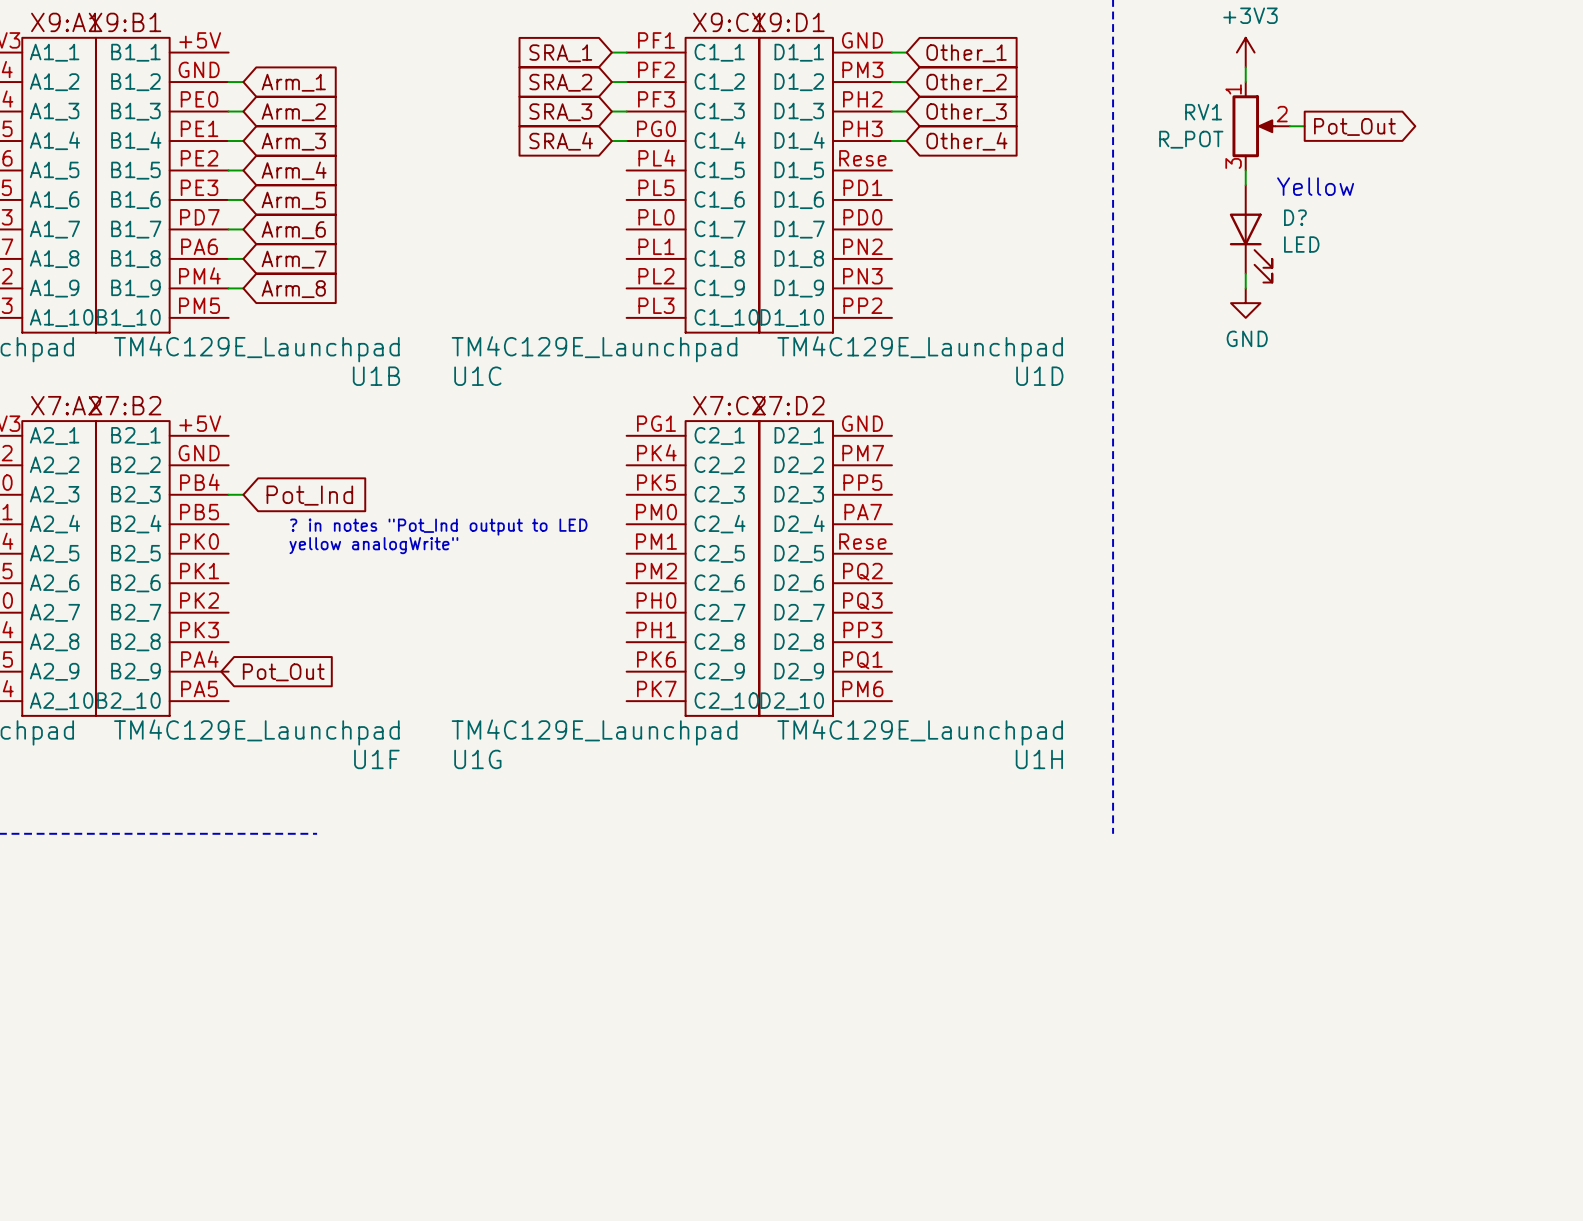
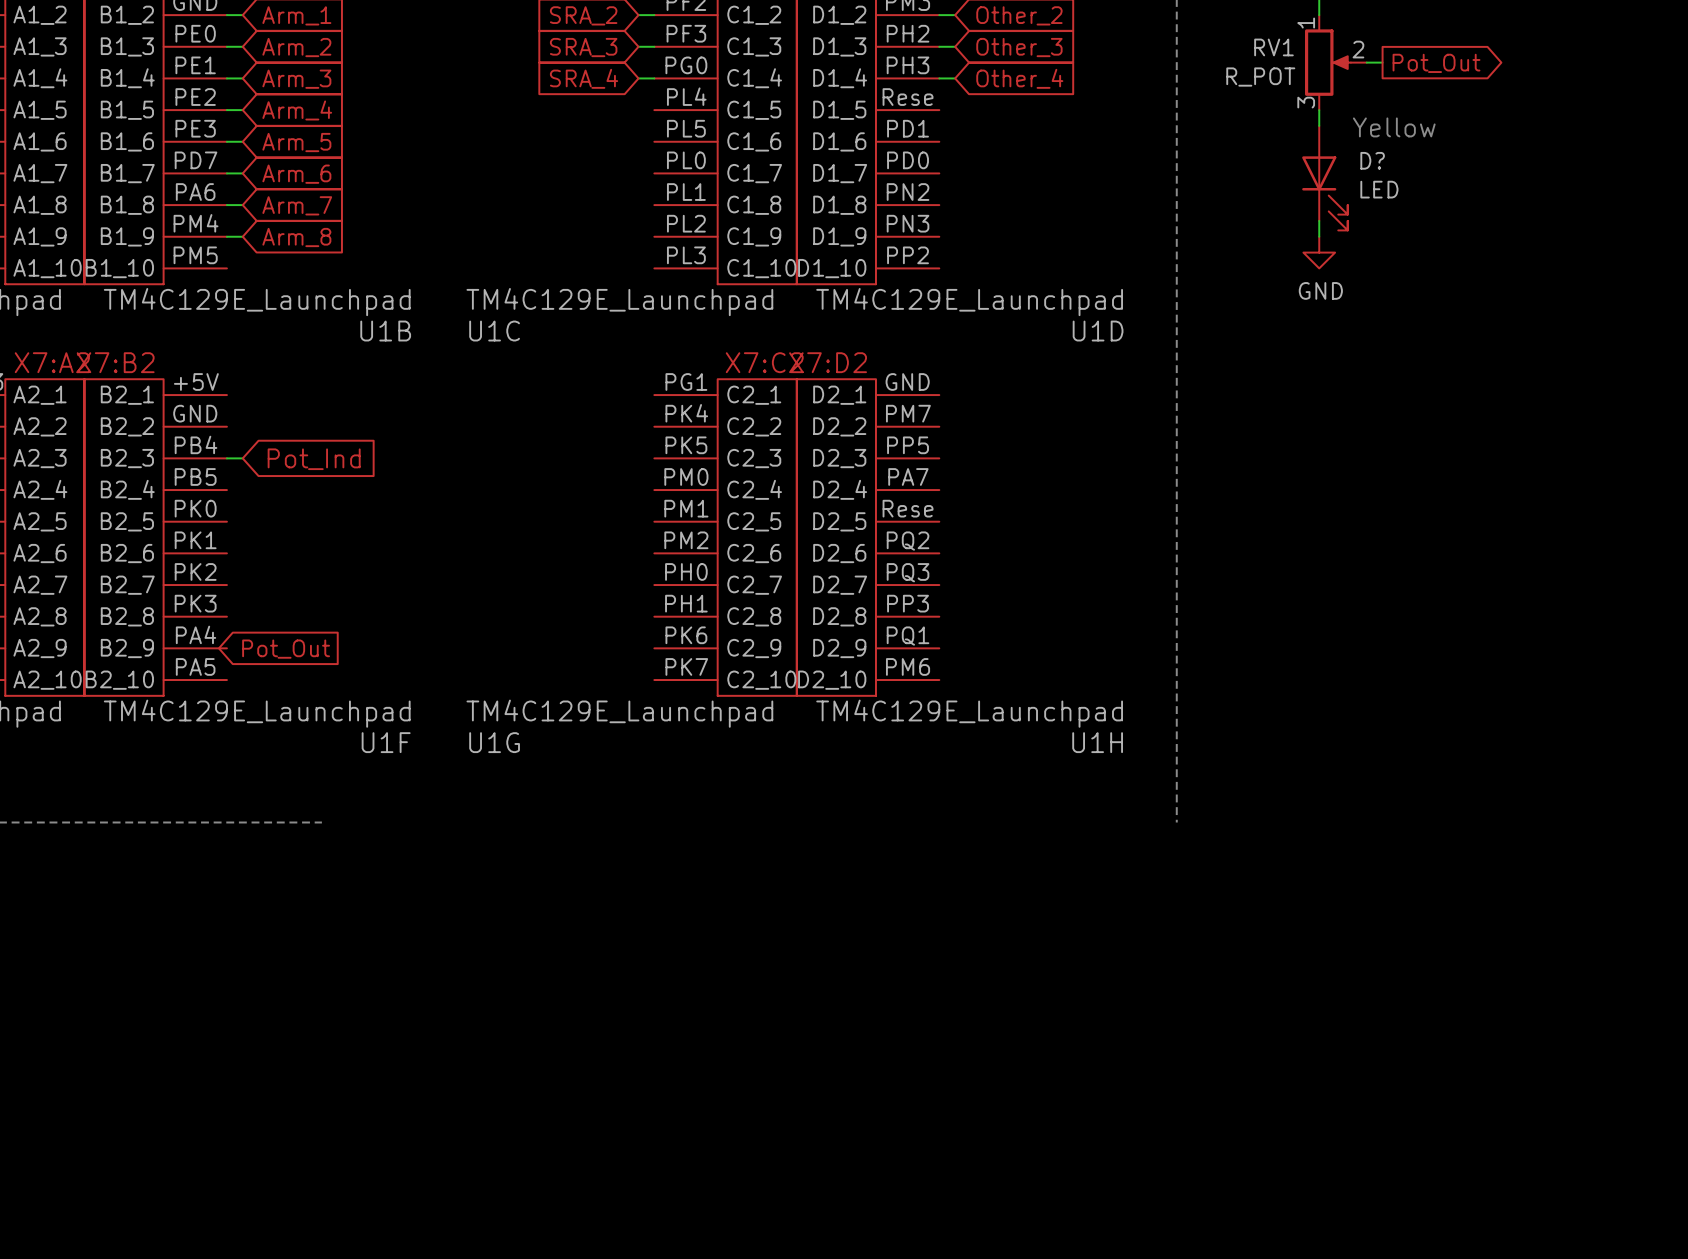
text: ? in notes "Pot_Ind output to LED (438, 527) -> none
text: yellow analogWrite" (373, 545) -> none

